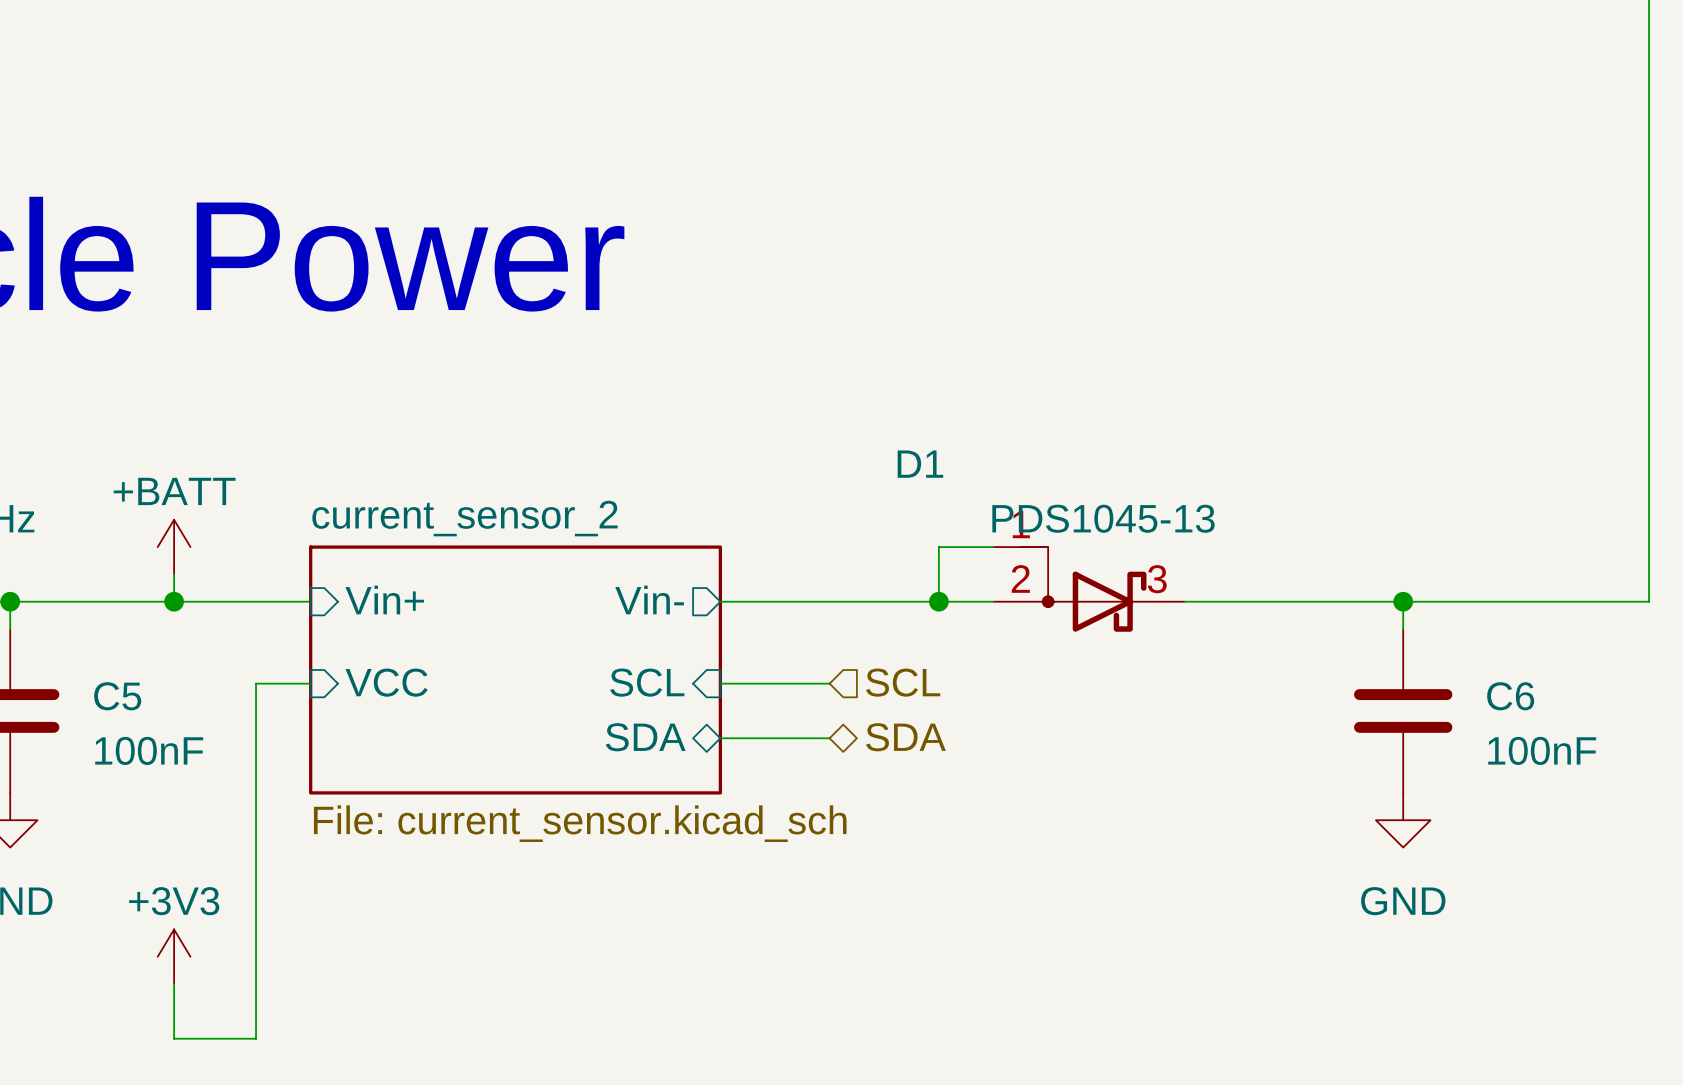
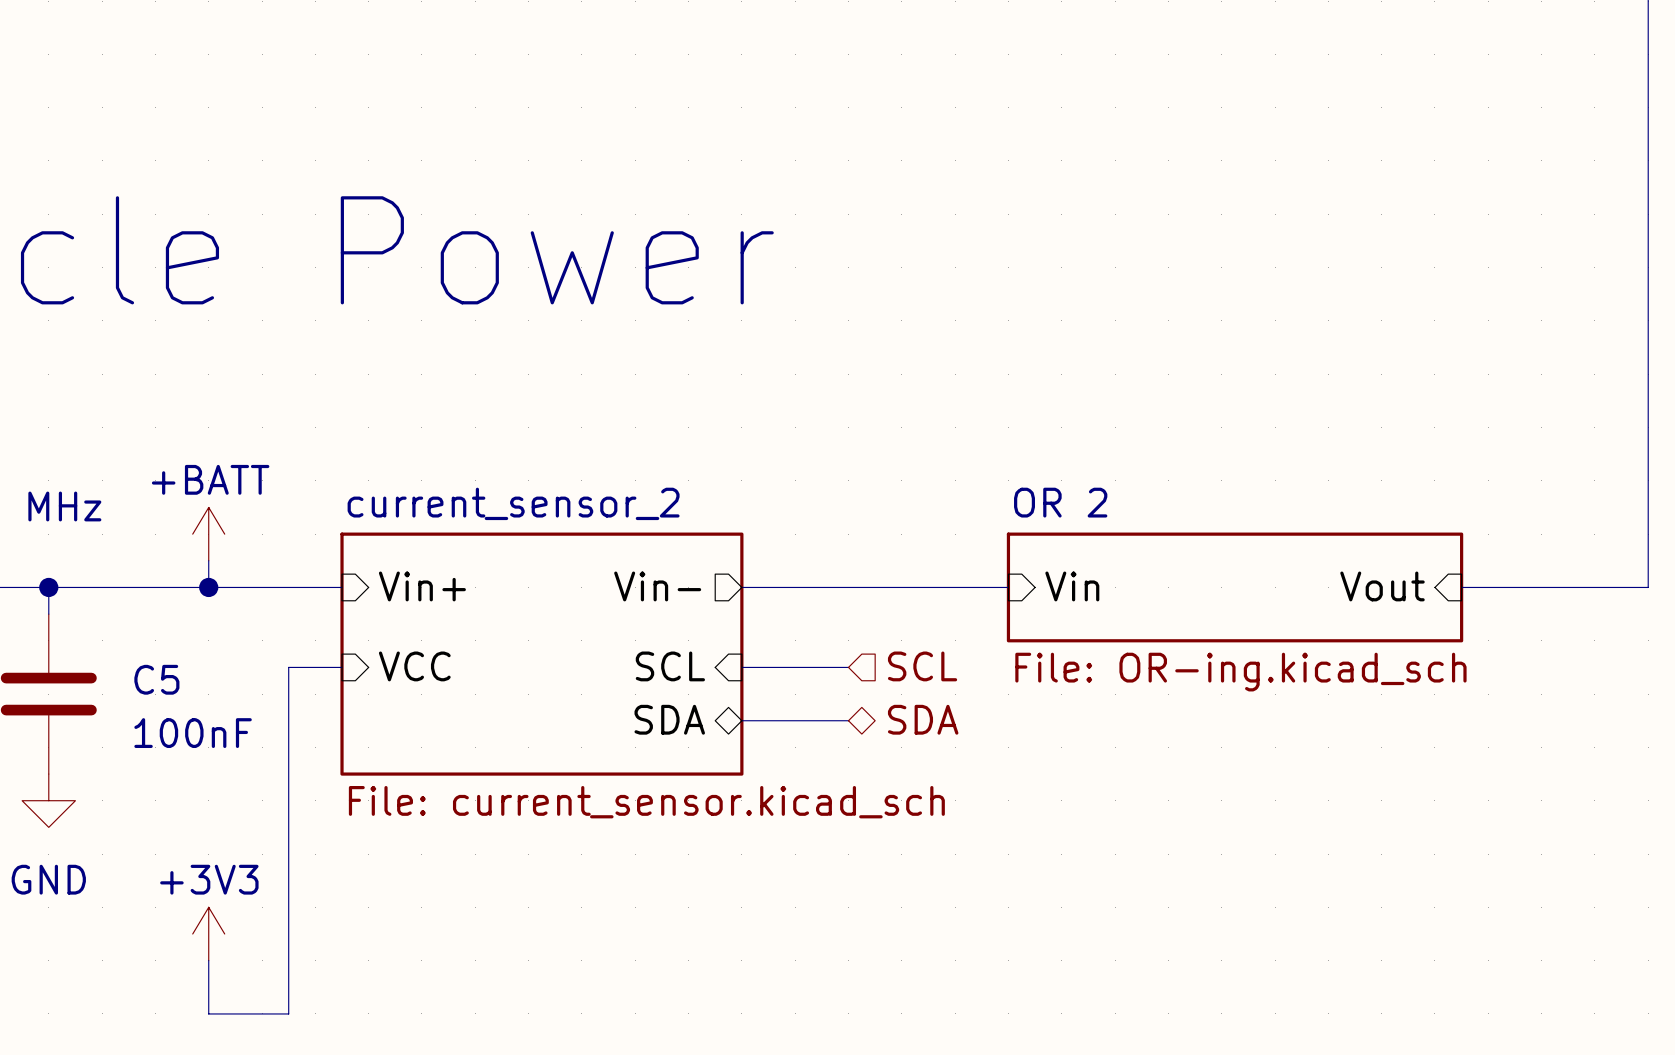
wire: (993, 547) (938, 547) (938, 601) -> none
D1: (1089, 589) -> none
sheet pin: none -> Vin (1072, 586)
sheet pin: none -> Vout (1382, 586)
junction: (938, 601) -> none
wire: (1184, 601) (1457, 601) -> none
sheet OR 2: none -> File: OR-ing.kicad_sch (1235, 587)
wire: (1403, 601) (1403, 629) -> none
junction: (1403, 601) -> none
C6: 100nF (1403, 710) -> none
power symbol: GND (1403, 820) -> none

